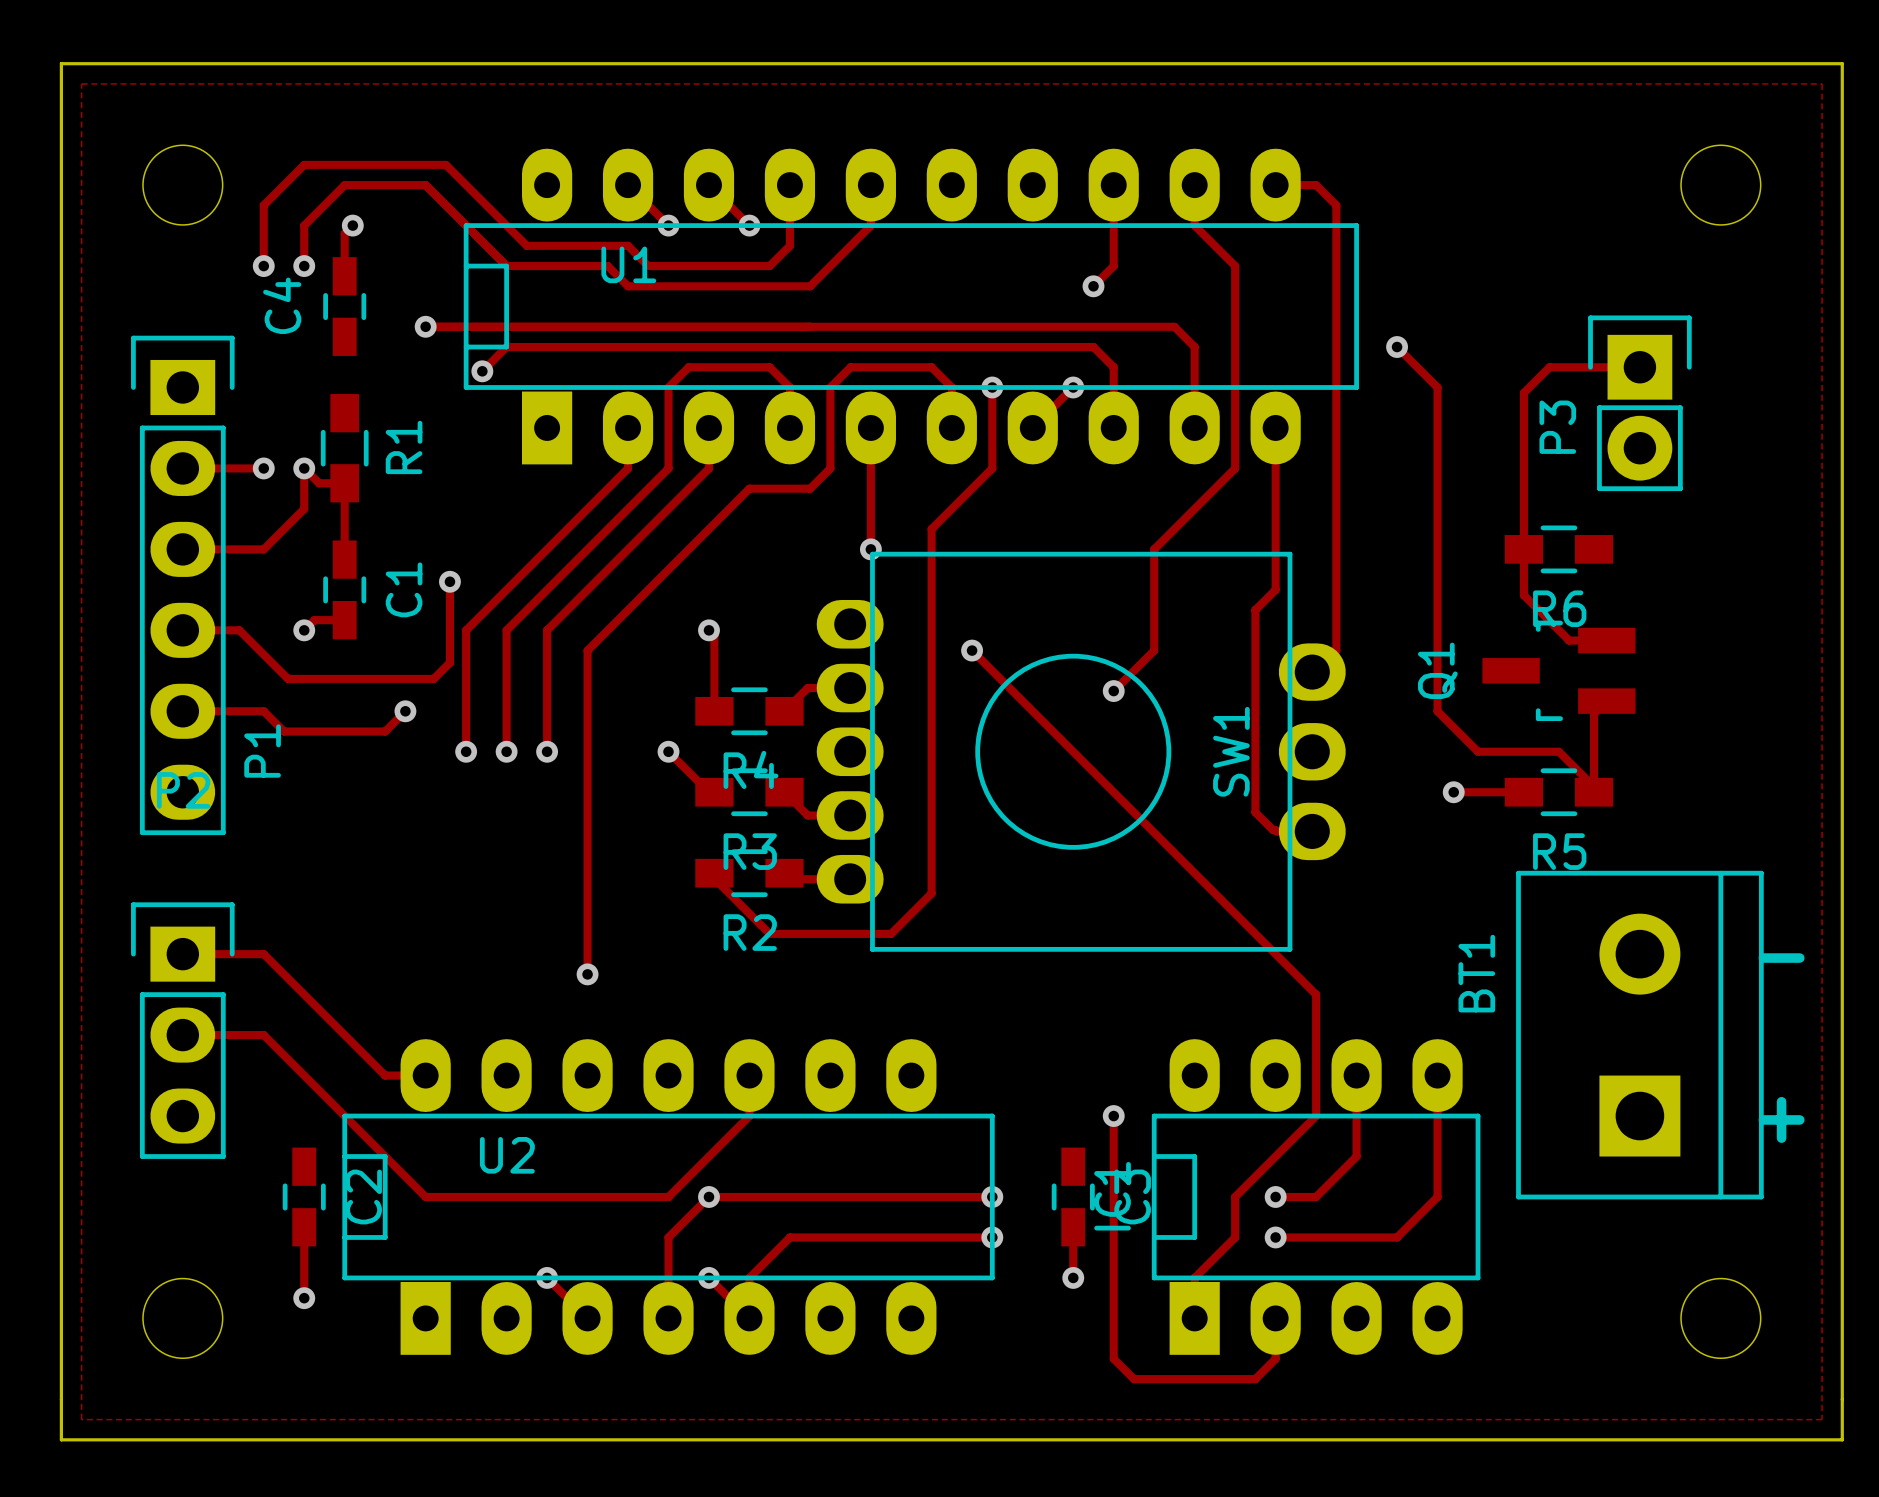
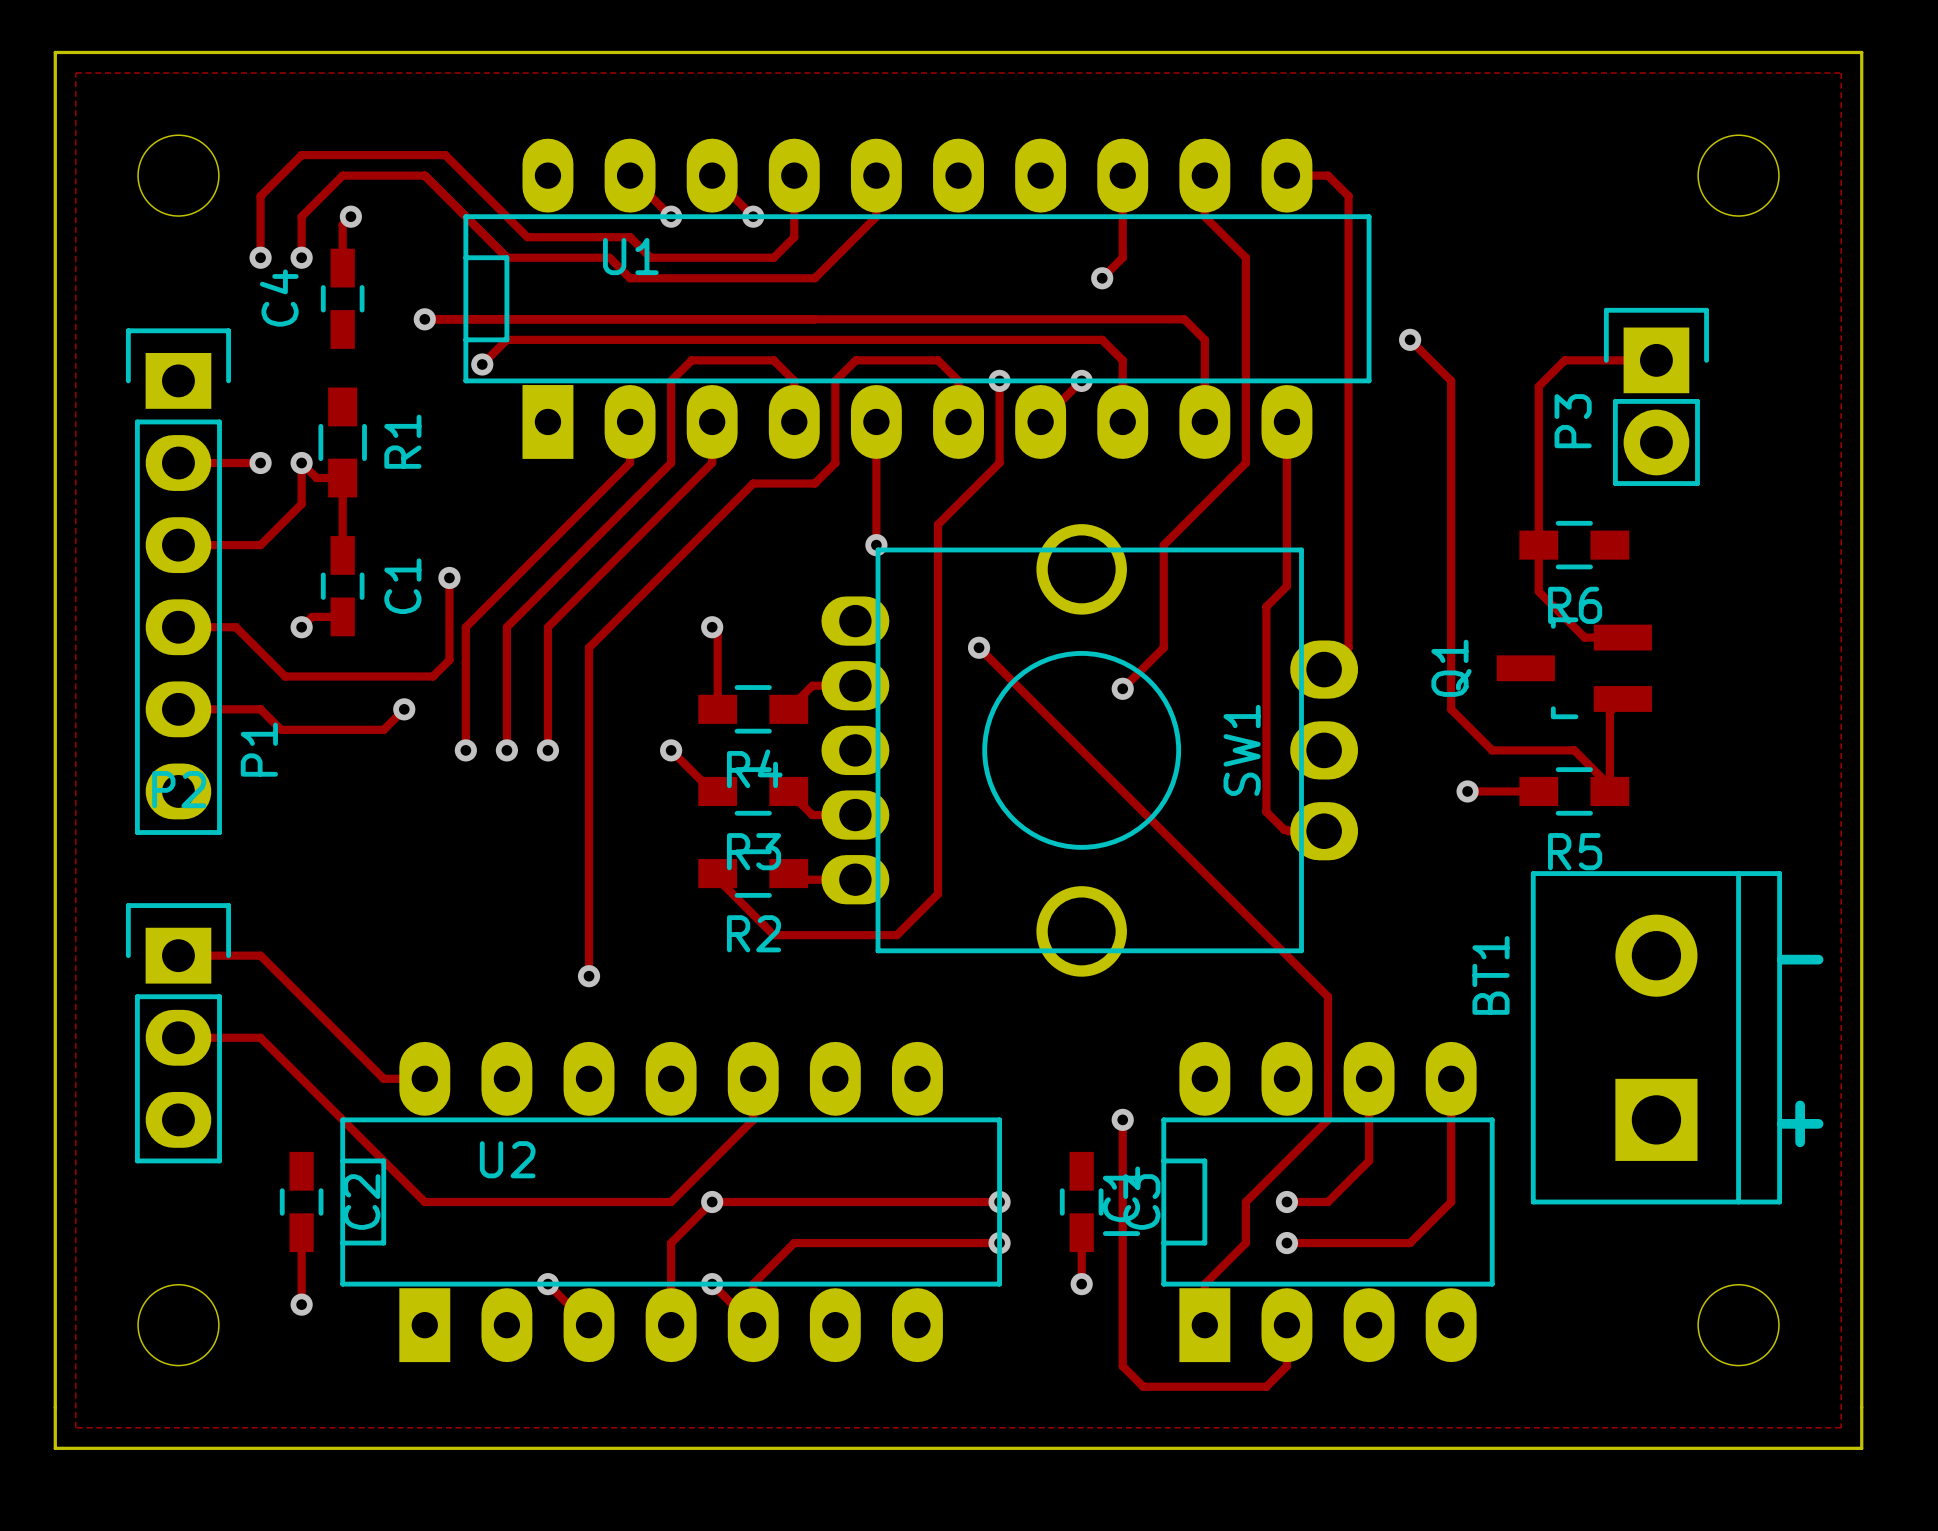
SW1 footprint: [816, 551, 1346, 952] -> [821, 524, 1359, 977]

